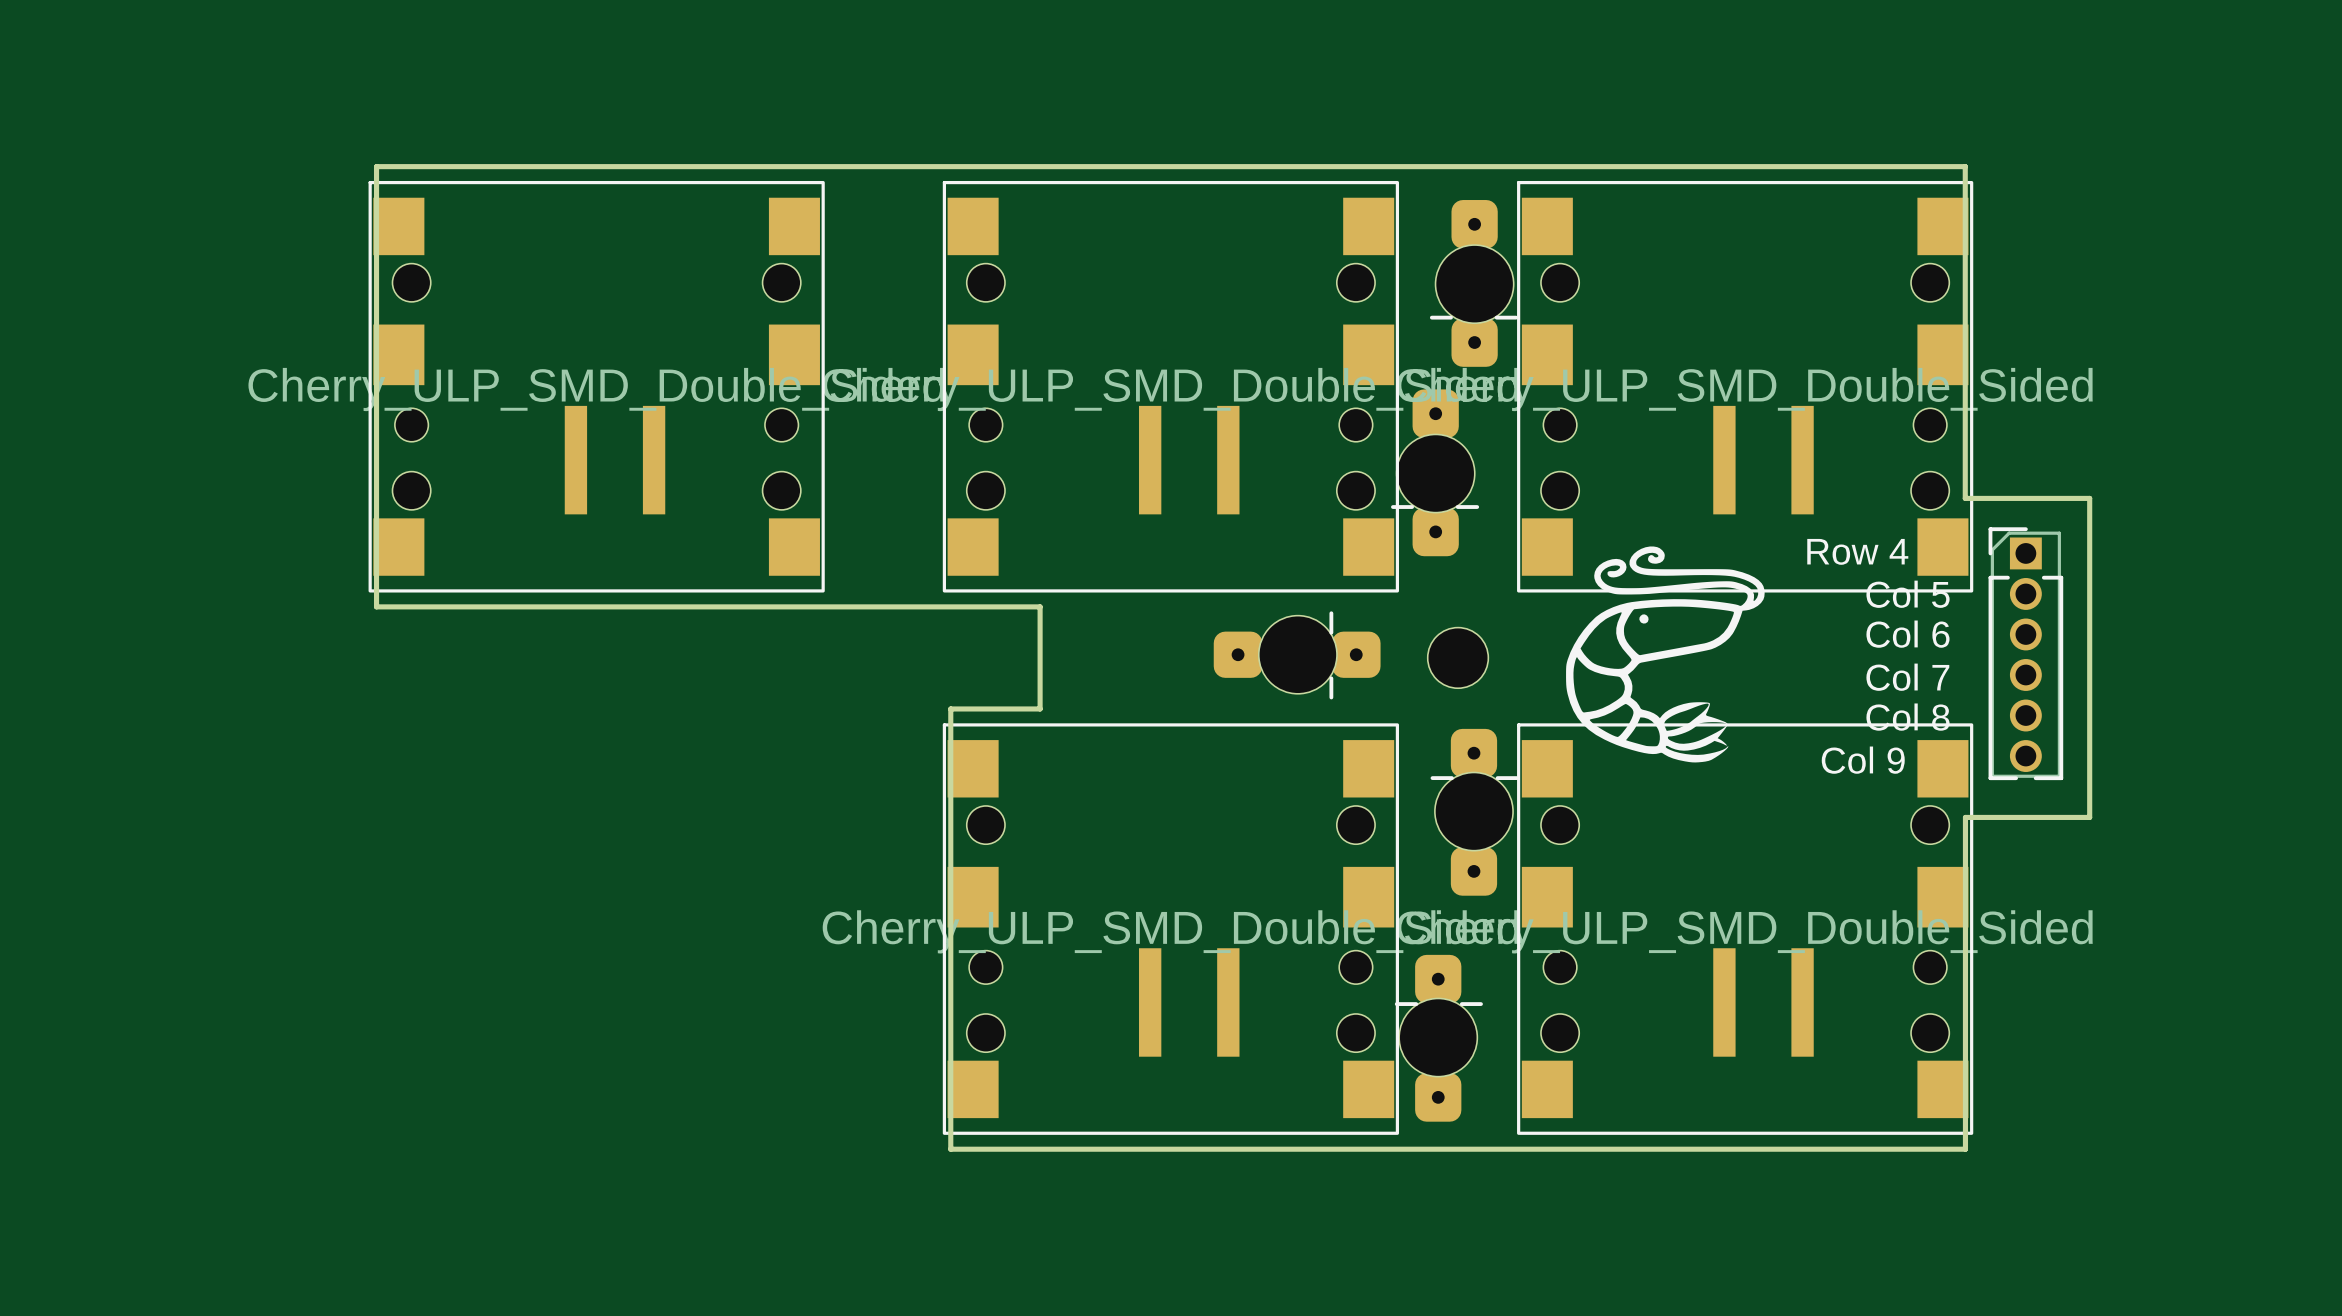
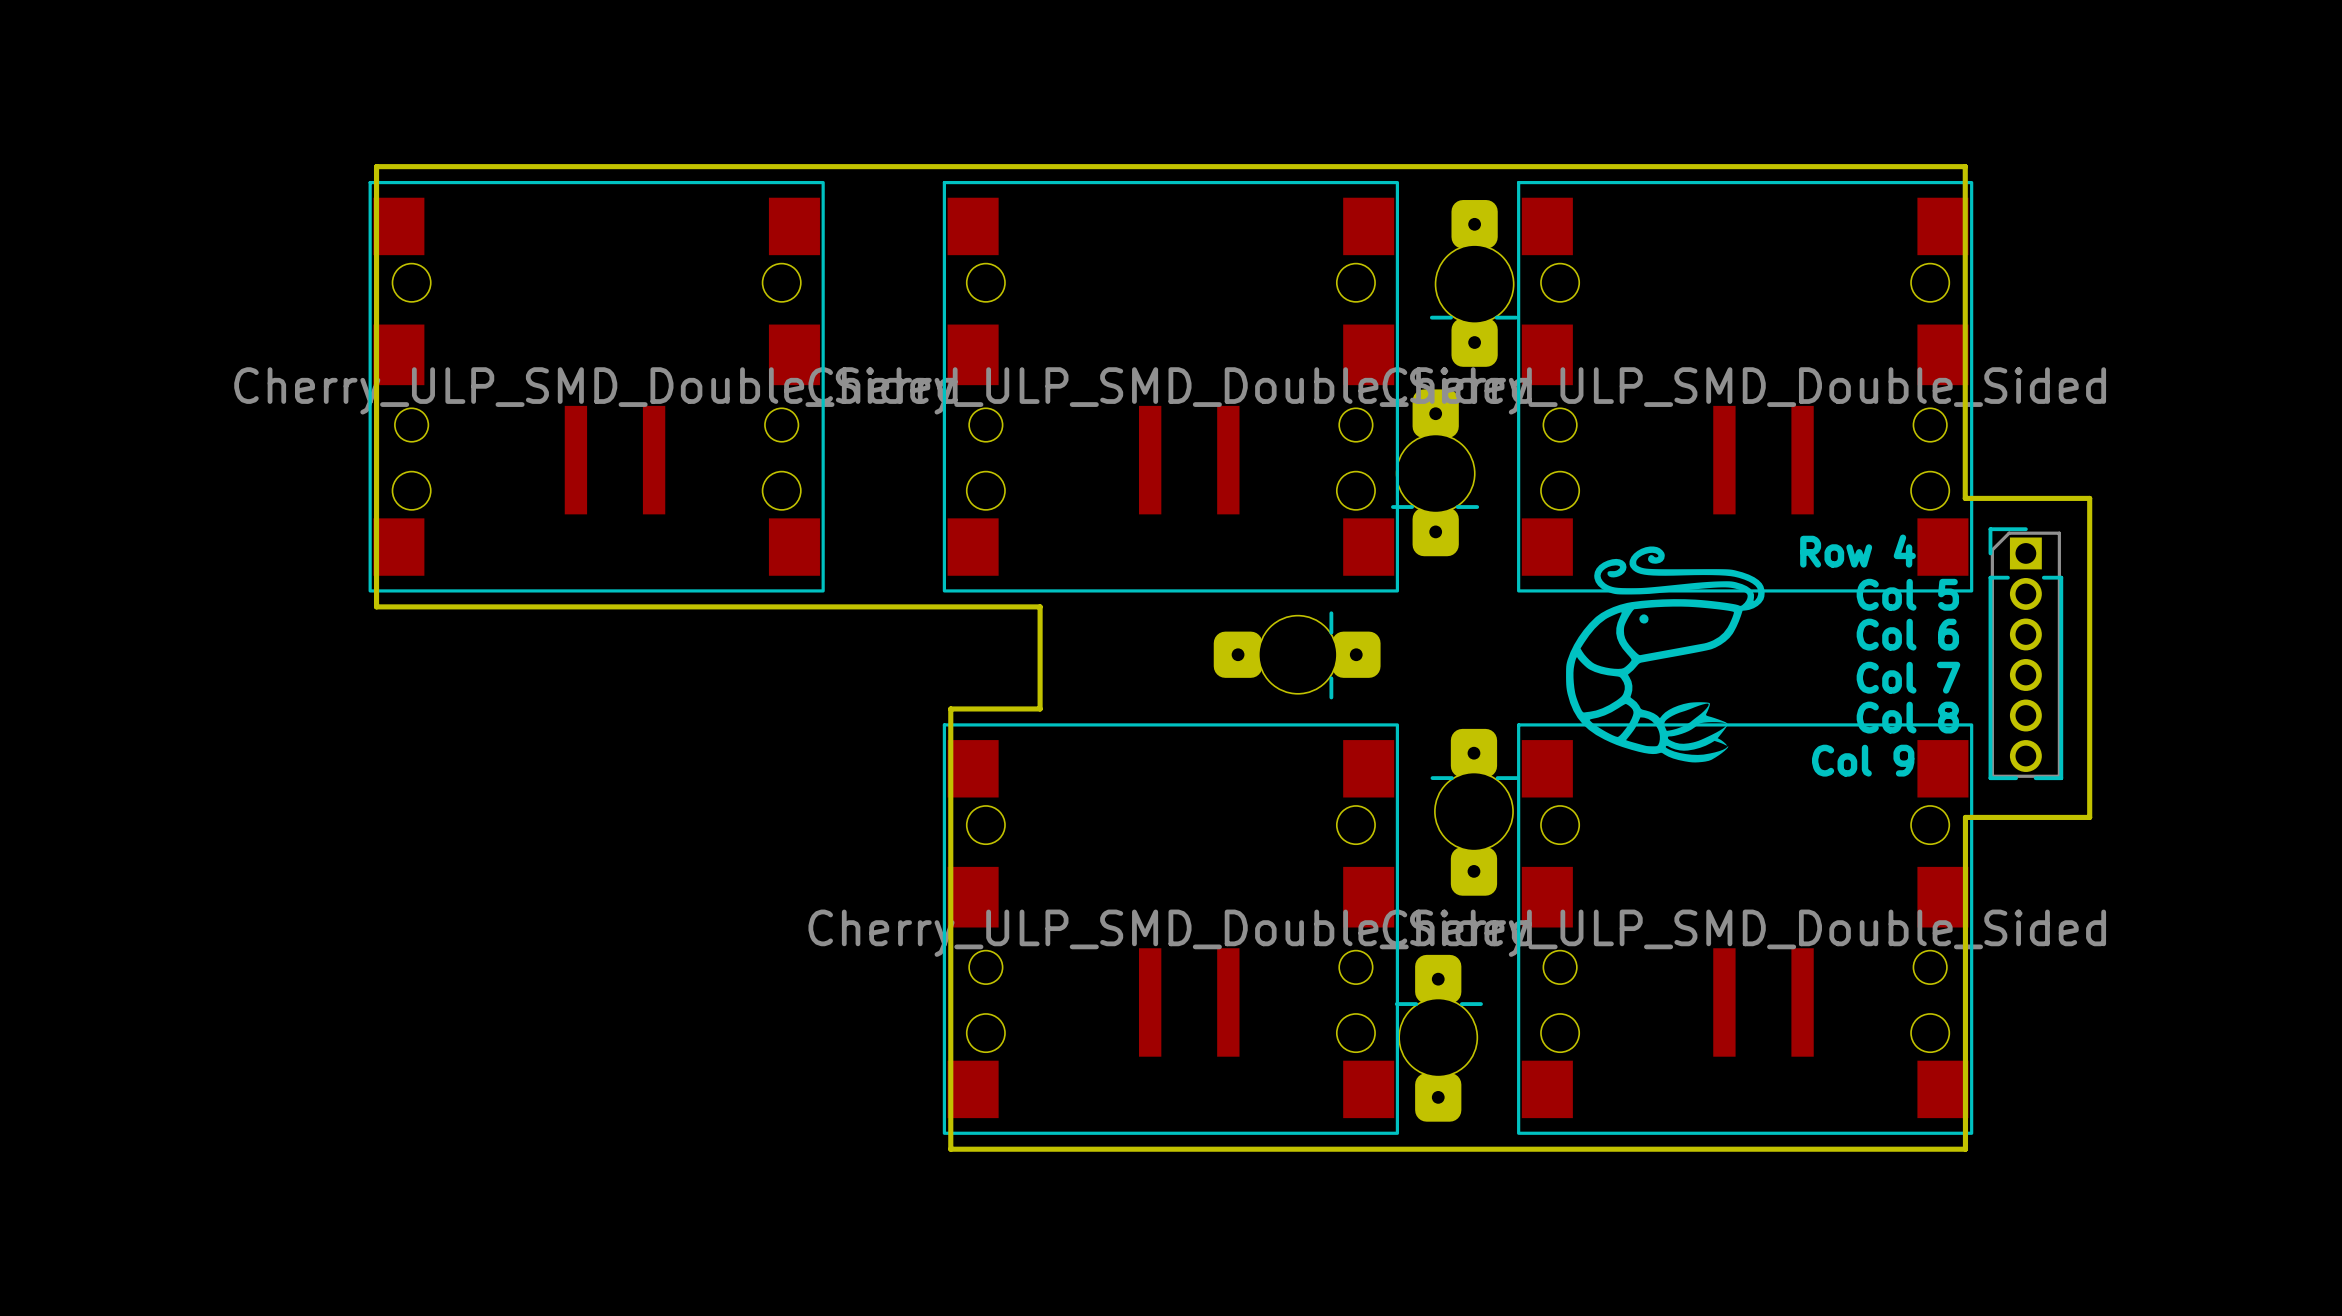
part: (1458, 657) -> none

